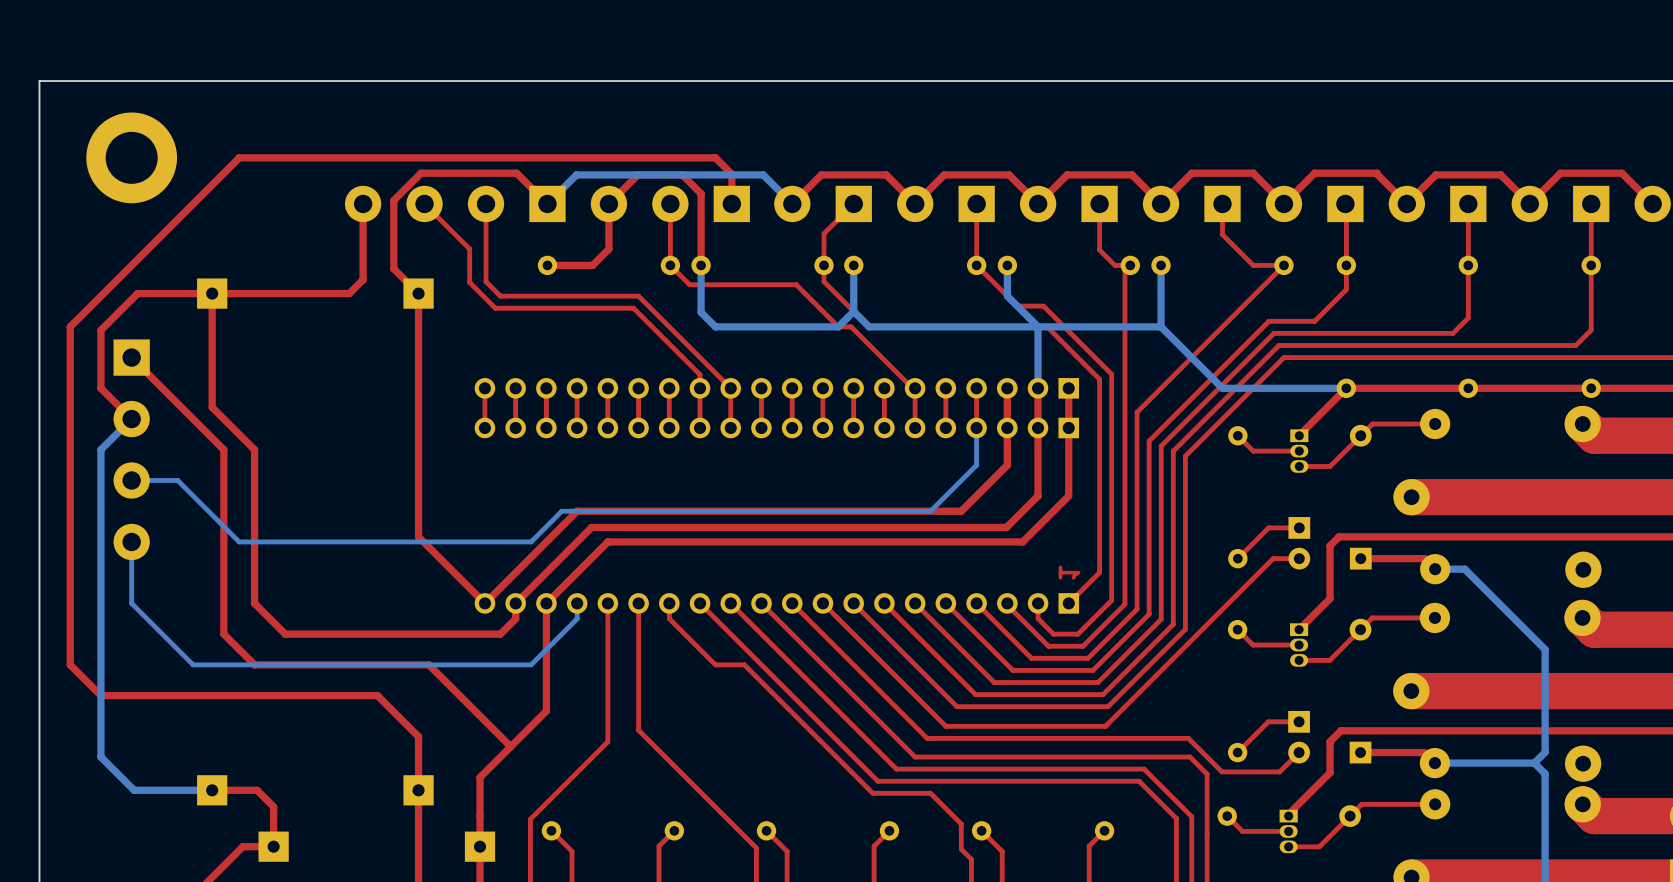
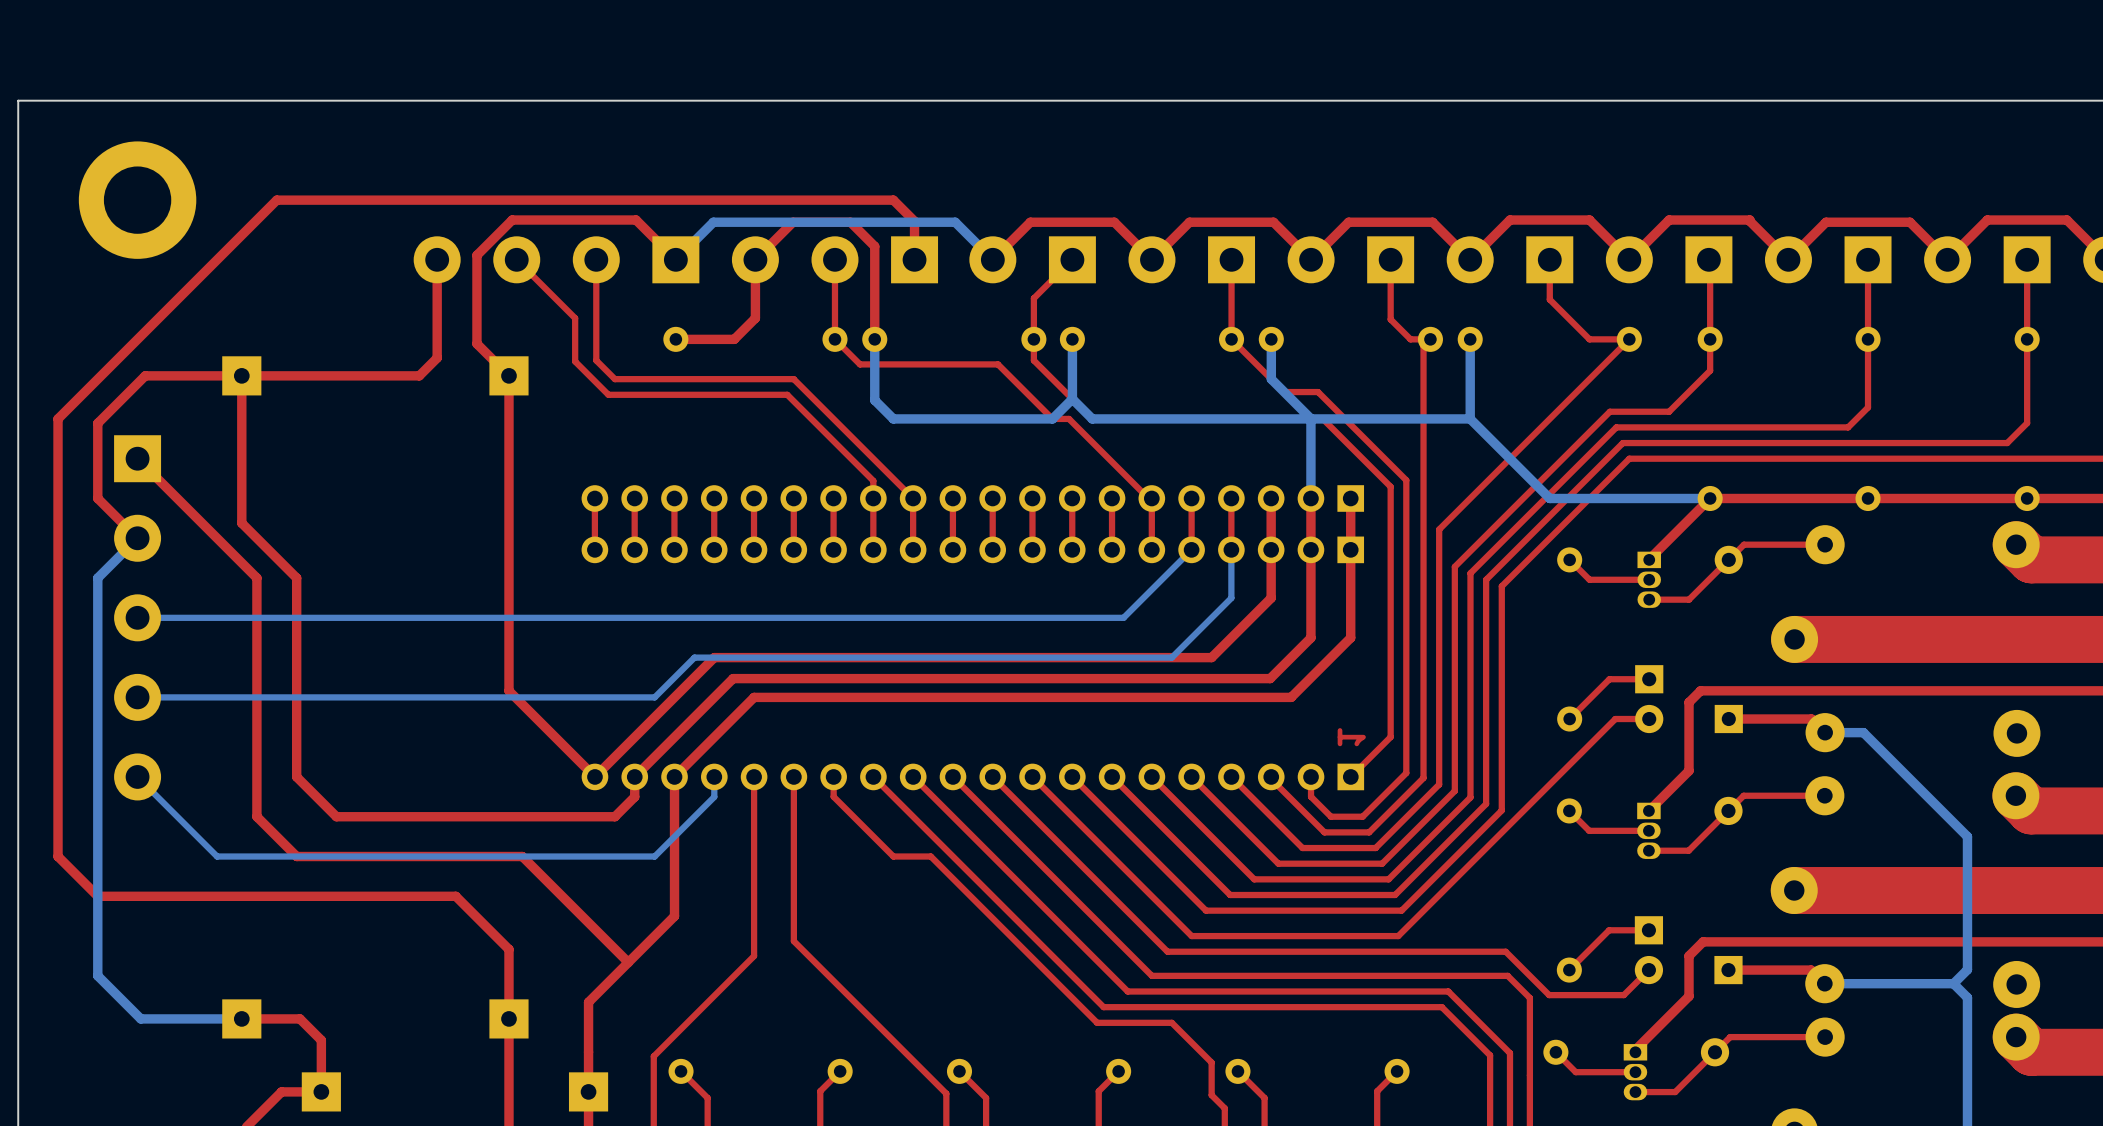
bottom track: none -> (1191, 549) (1123, 617) (197, 617)
part: (131, 449) -> none
part: none -> (137, 617)
bottom track: (177, 480) (239, 541) -> (137, 697) (276, 697)
bottom track: (131, 541) (131, 603) -> none

